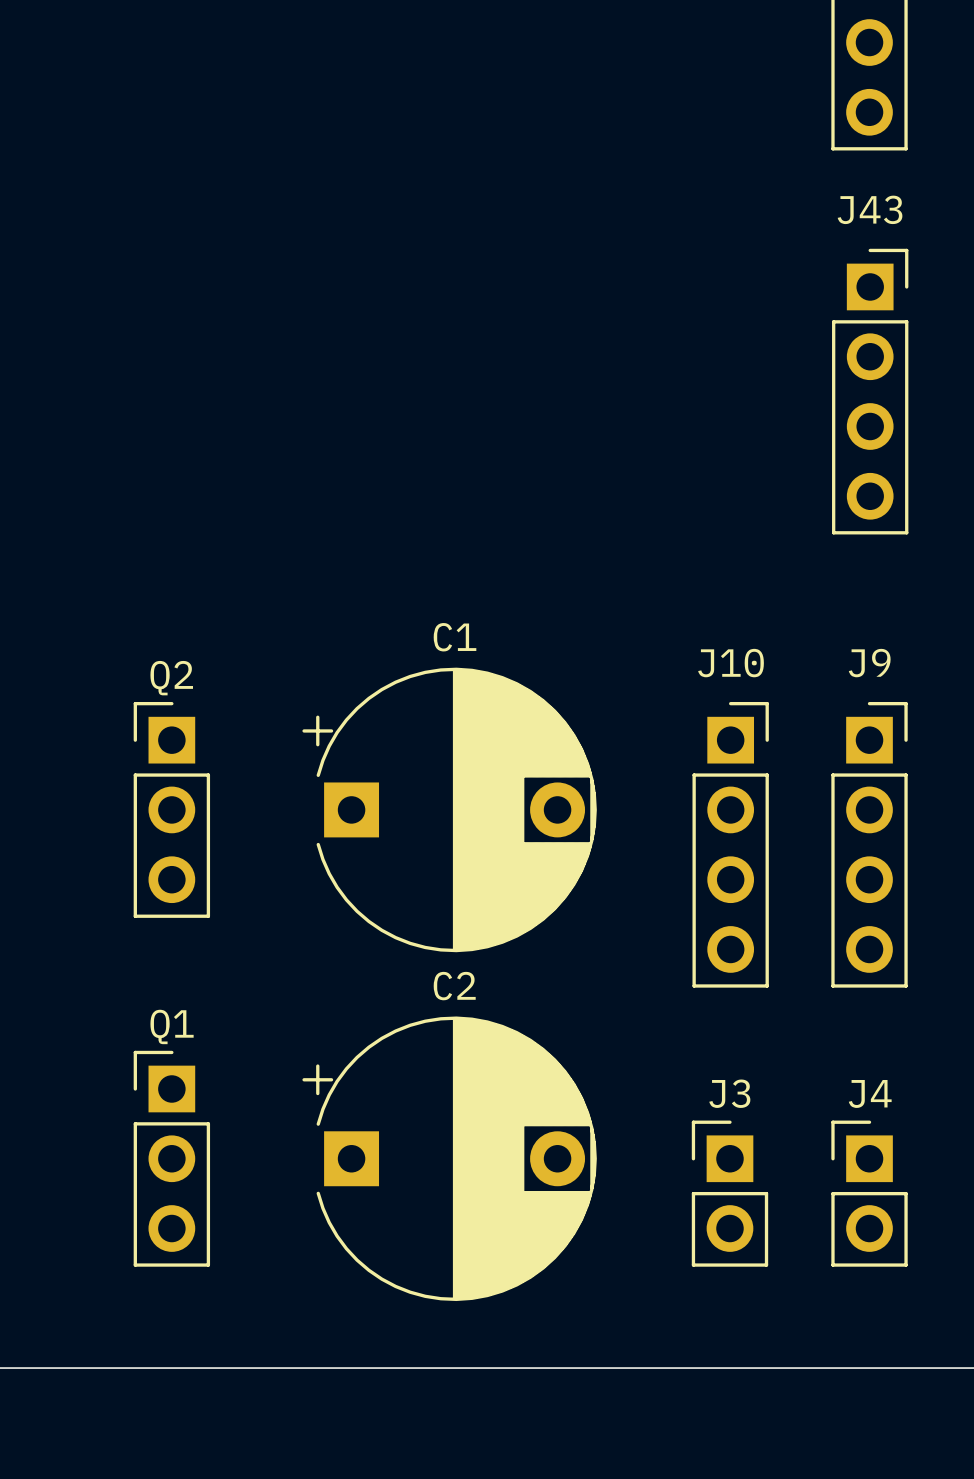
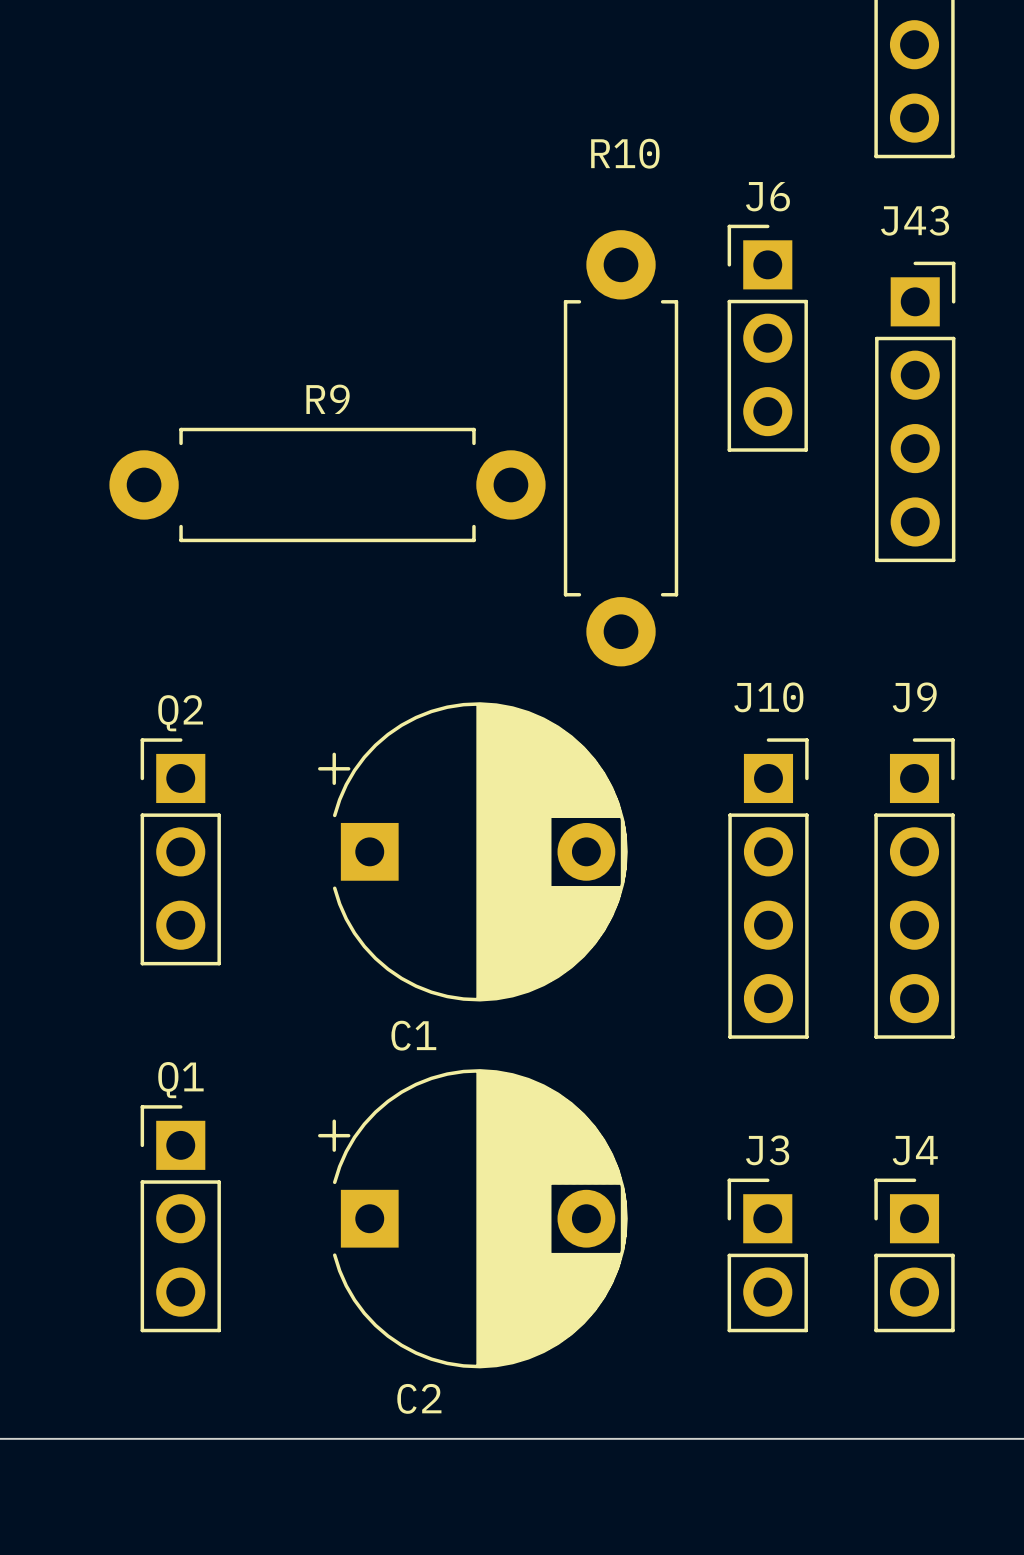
J6: none -> (767, 338)
R10: none -> (621, 448)
R9: none -> (327, 484)
C1 name position: C1 (455, 637) -> C1 (413, 1035)
C2 name position: C2 (454, 986) -> C2 (419, 1398)

